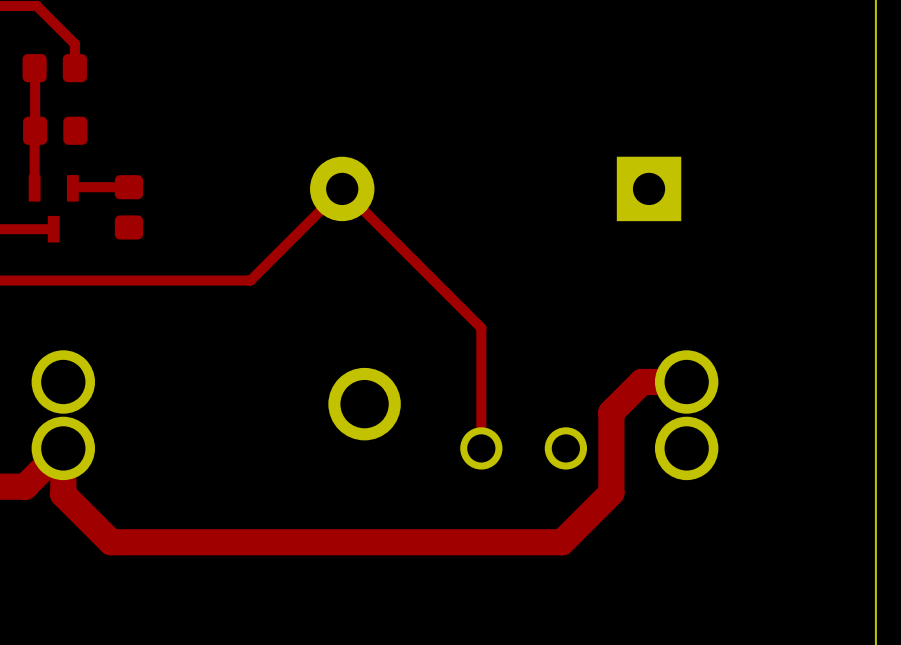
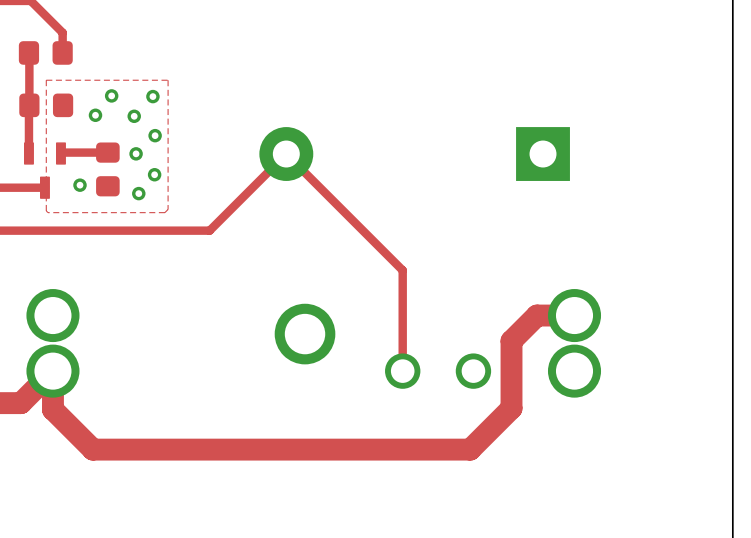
top zone outline: none -> (168, 80) (46, 80) (46, 210) (47, 212) (164, 212) (168, 209) (168, 80)
via: none -> (111, 95)
via: none -> (152, 96)
via: none -> (95, 115)
via: none -> (134, 116)
via: none -> (155, 135)
via: none -> (136, 153)
via: none -> (154, 174)
via: none -> (80, 185)
via: none -> (138, 193)

